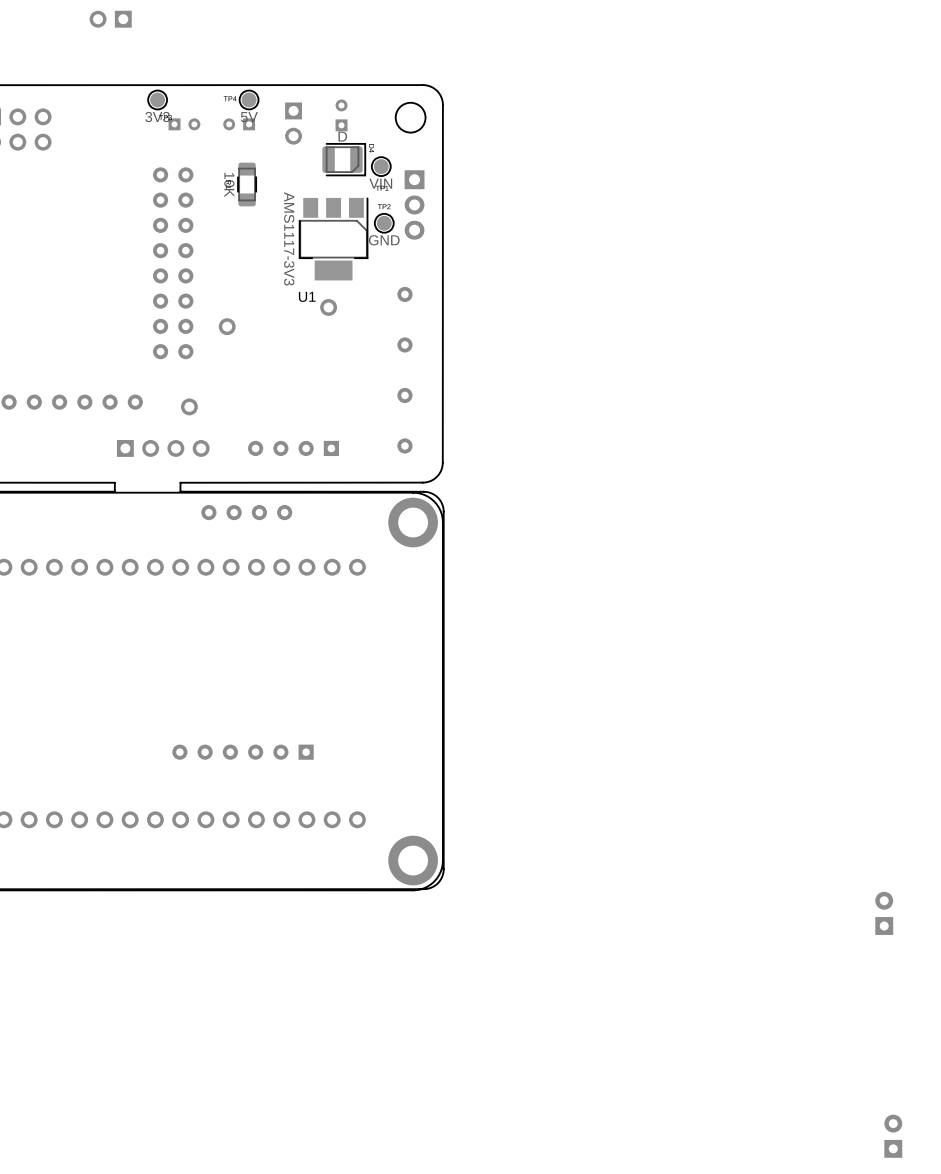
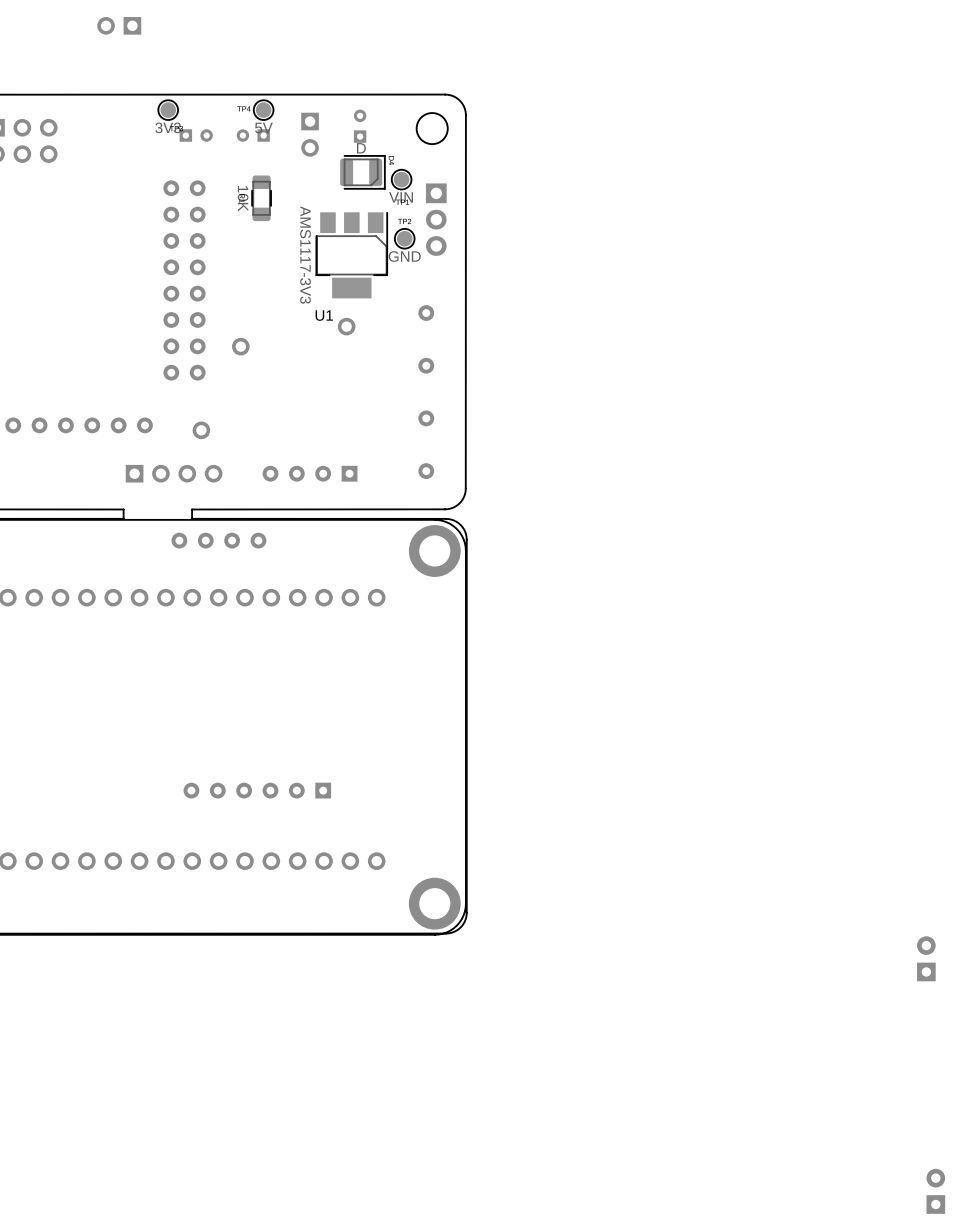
part position: (246, 512) -> (218, 540)

